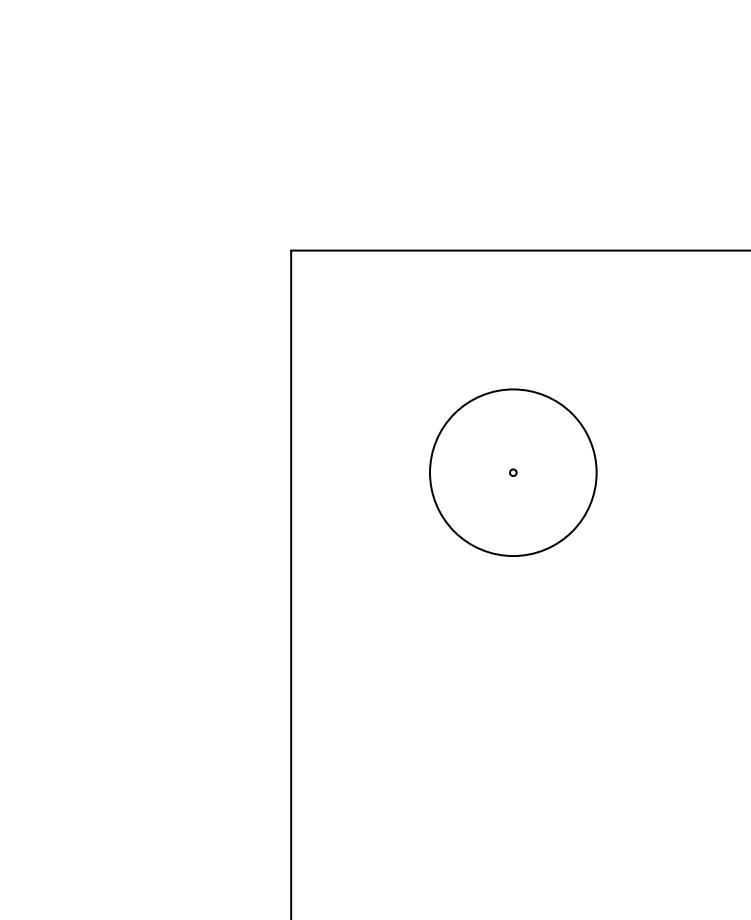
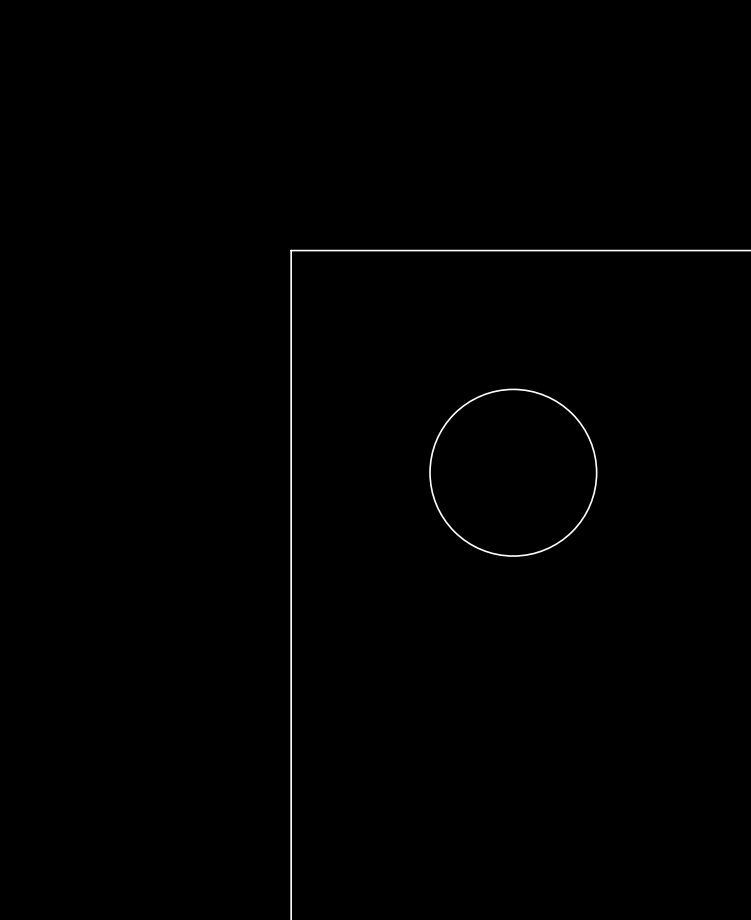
hole: (513, 472) -> none

